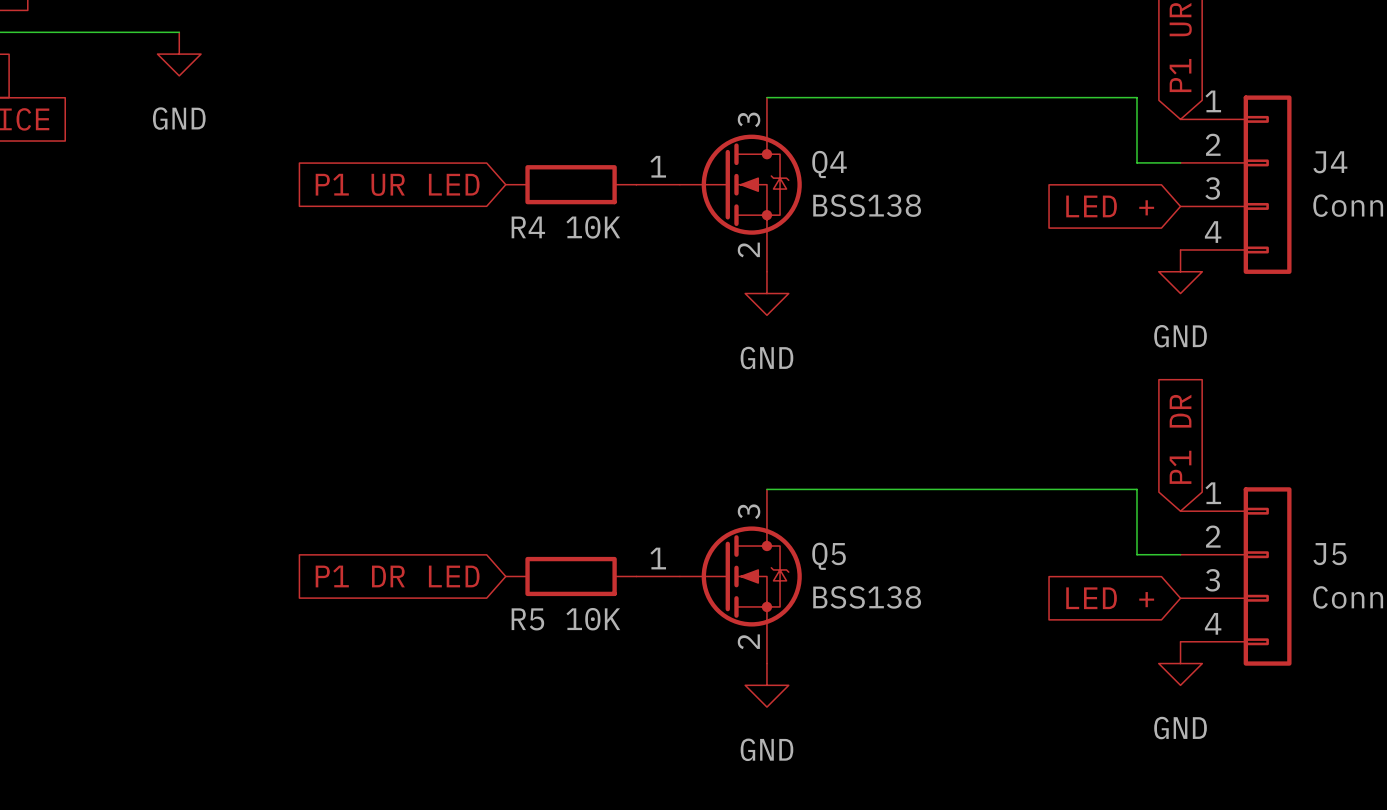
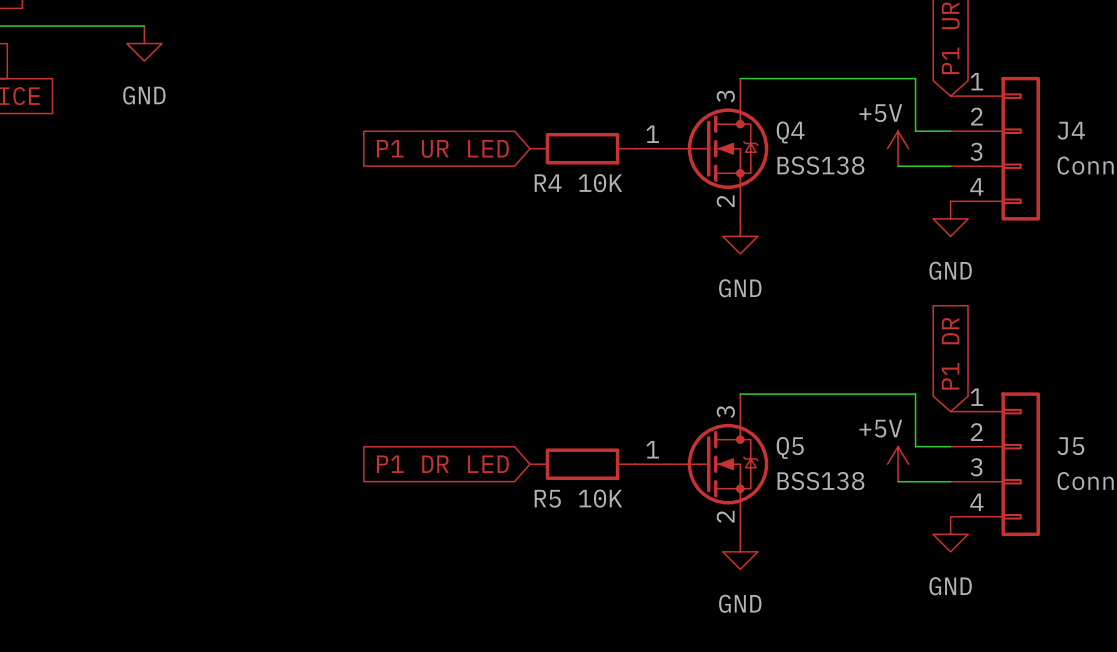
wire: (766, 97) (919, 97) -> none
global label position: P1 UR LED (397, 184) -> P1 UR LED (442, 148)
R4 position: (571, 184) -> (582, 148)
Q4 position: (719, 184) -> (701, 148)
power symbol: none -> +5V (898, 148)
global label: LED + (1110, 206) -> none
wire: none -> (898, 166) (950, 166)
power symbol position: GND (766, 293) -> GND (740, 236)
wire: (766, 489) (919, 489) -> none
global label position: P1 DR LED (397, 576) -> P1 DR LED (442, 464)
R5 position: (571, 576) -> (582, 464)
Q5 position: (719, 576) -> (701, 464)
power symbol: none -> +5V (898, 464)
global label: LED + (1110, 598) -> none
wire: none -> (898, 481) (950, 481)
power symbol position: GND (766, 685) -> GND (740, 551)

